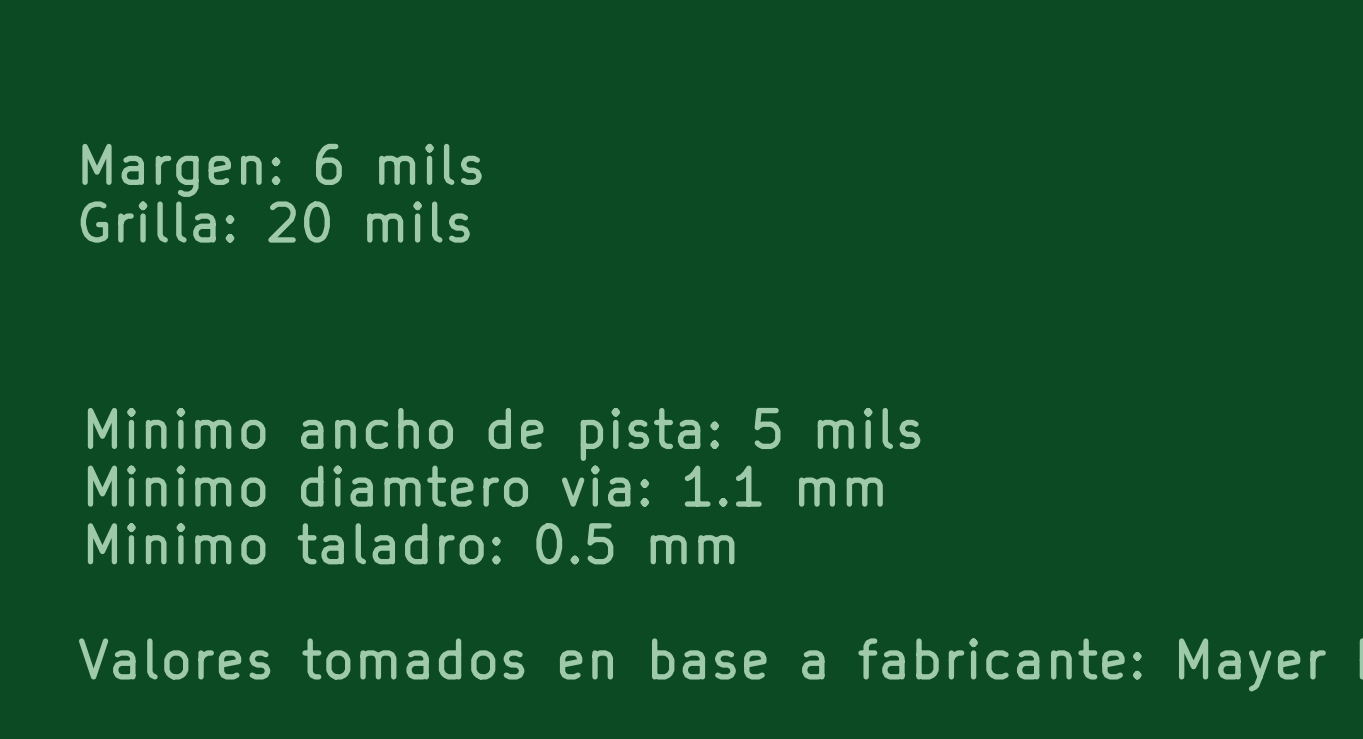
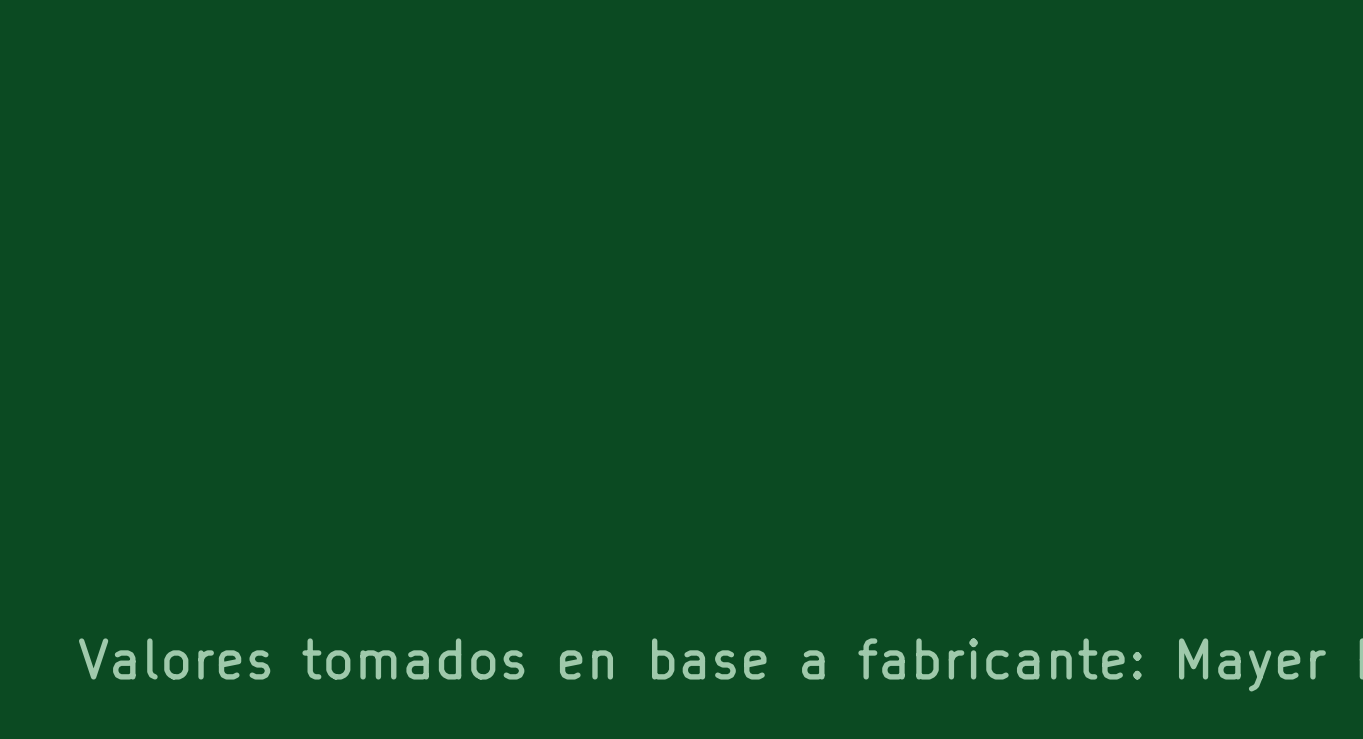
text: Margen: 6 mils (282, 170) -> none
text: Grilla: 20 mils (275, 222) -> none
text: Minimo ancho de pista: 5 mils (504, 434) -> none
text: Minimo diamtero via: 1.1 mm (485, 486) -> none
text: Minimo taladro: 0.5 mm (411, 543) -> none

